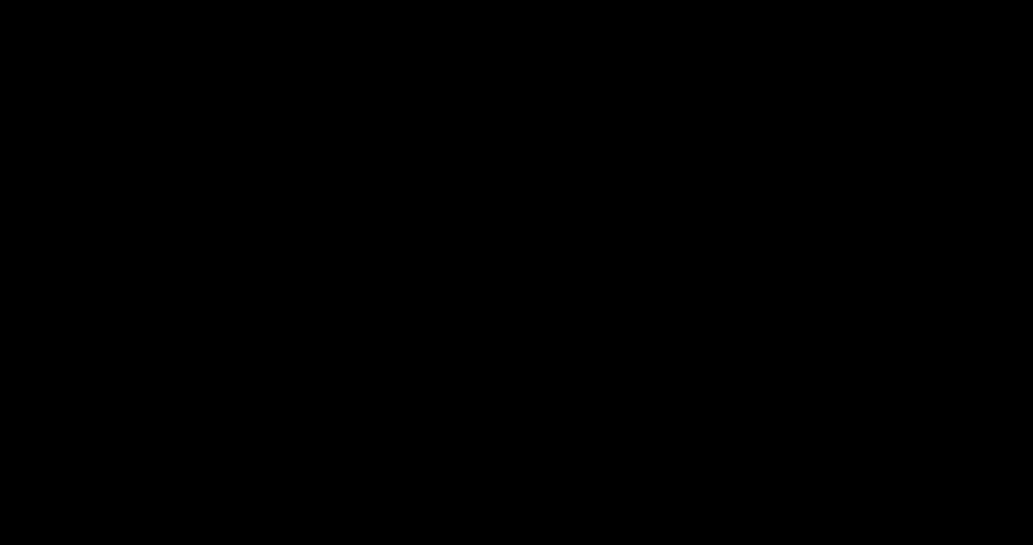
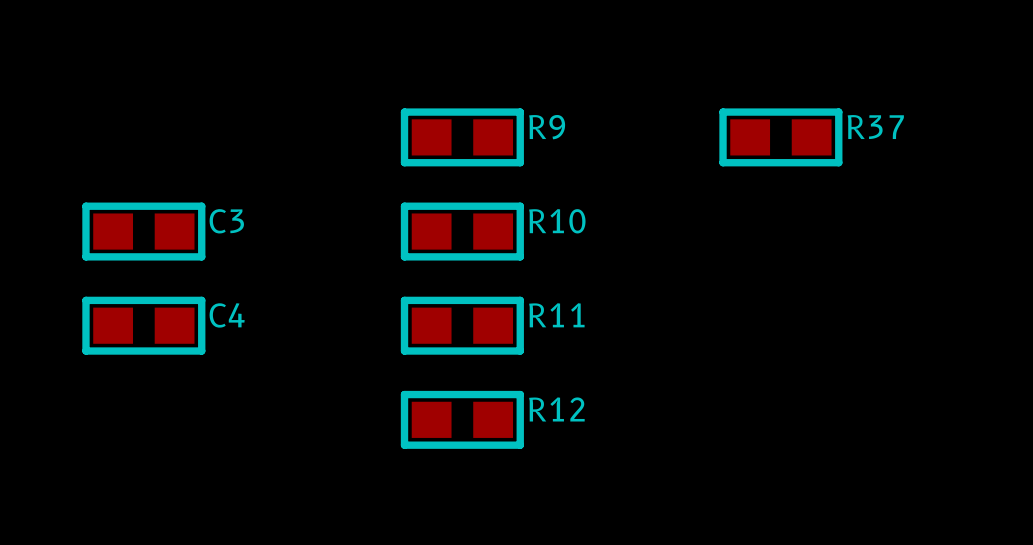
R9: none -> (462, 137)
R37: none -> (780, 137)
C3: none -> (143, 231)
R10: none -> (462, 231)
C4: none -> (143, 325)
R11: none -> (462, 325)
R12: none -> (462, 419)

